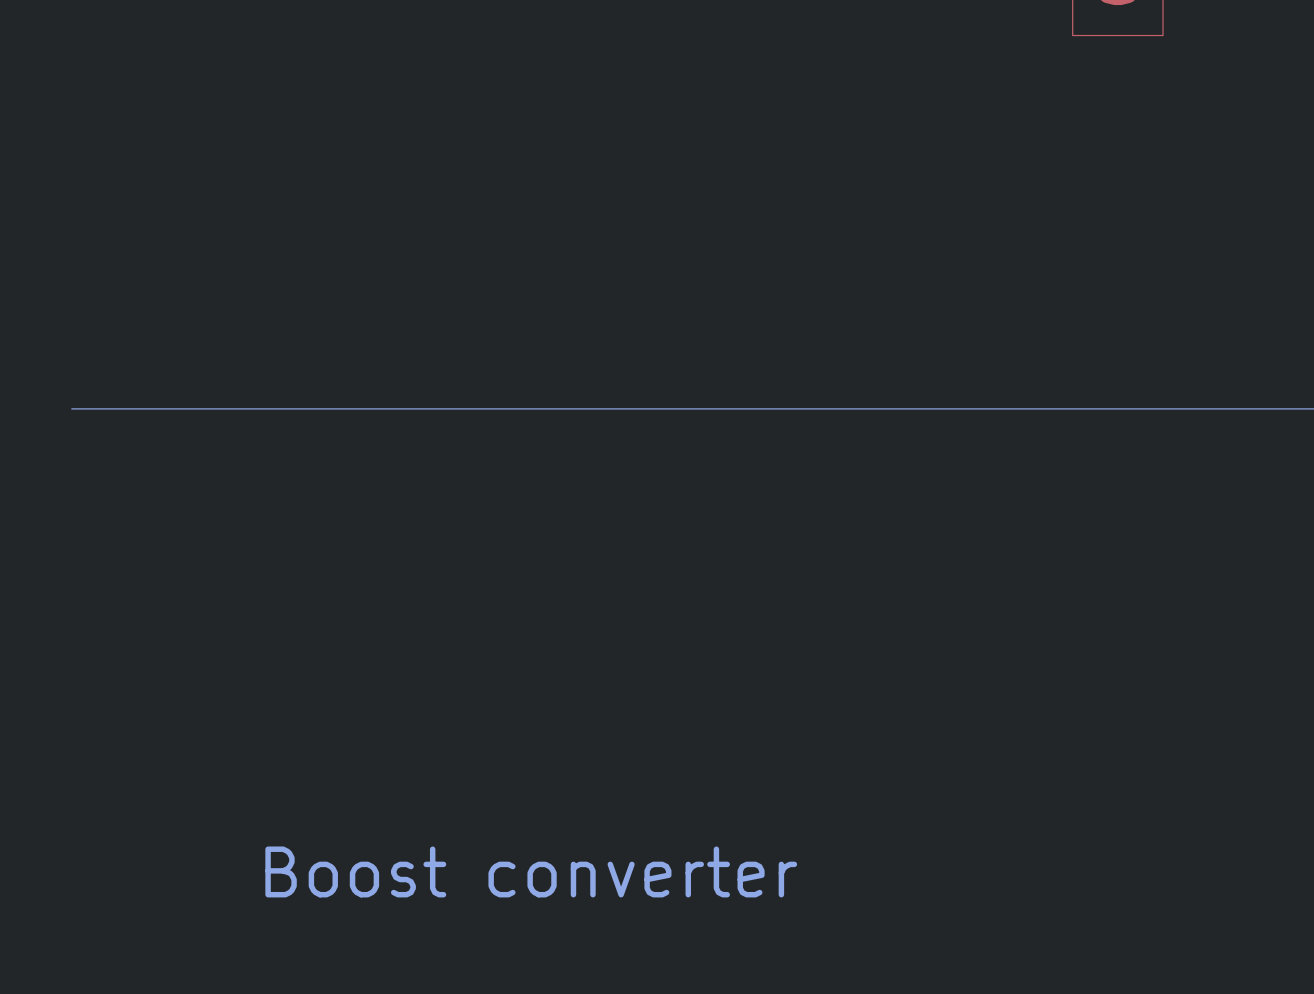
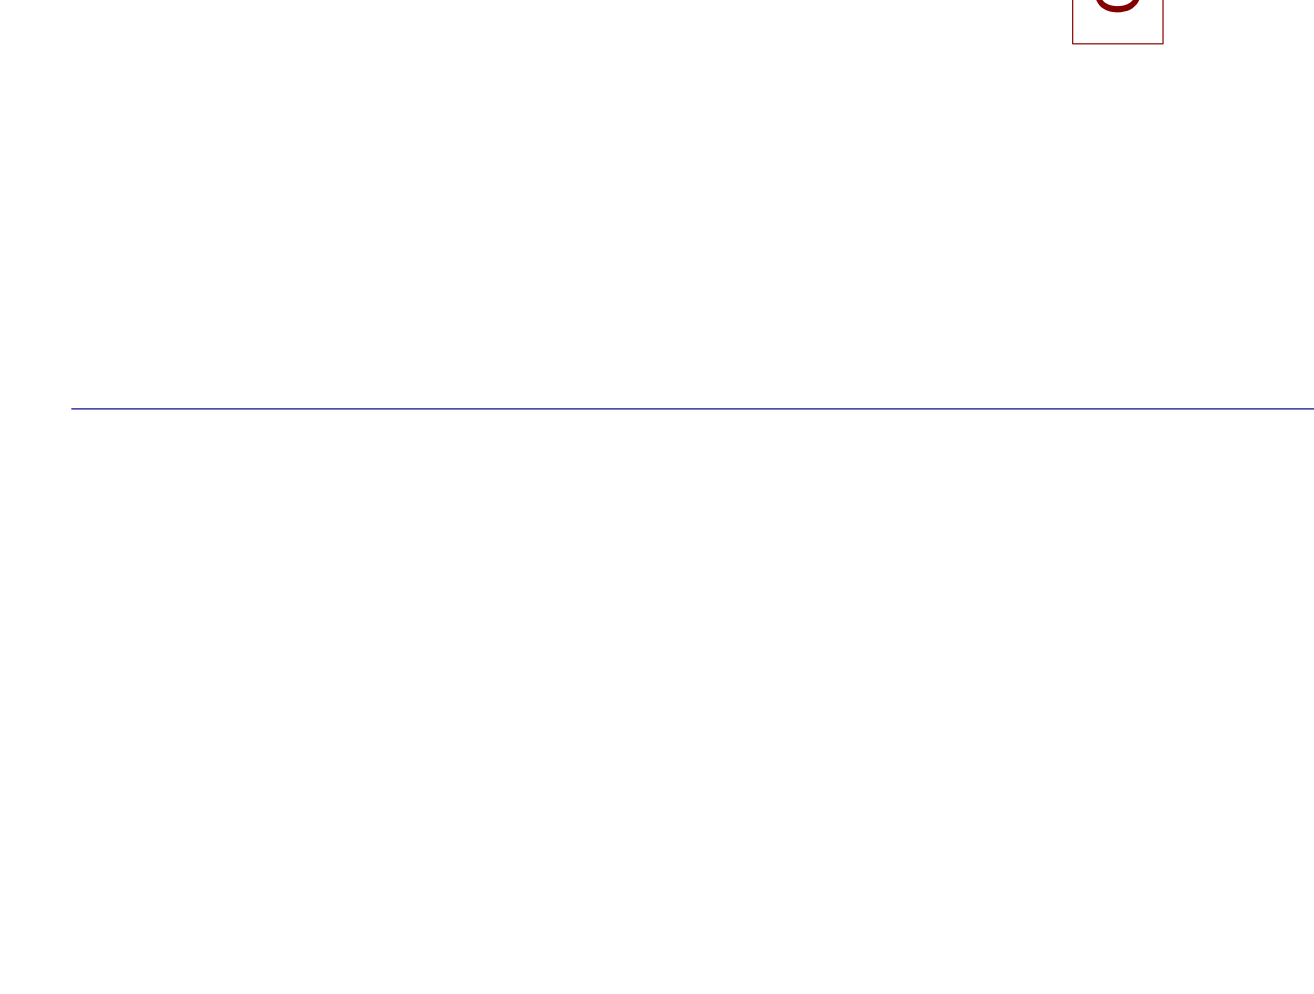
text: Boost converter (531, 871) -> none

